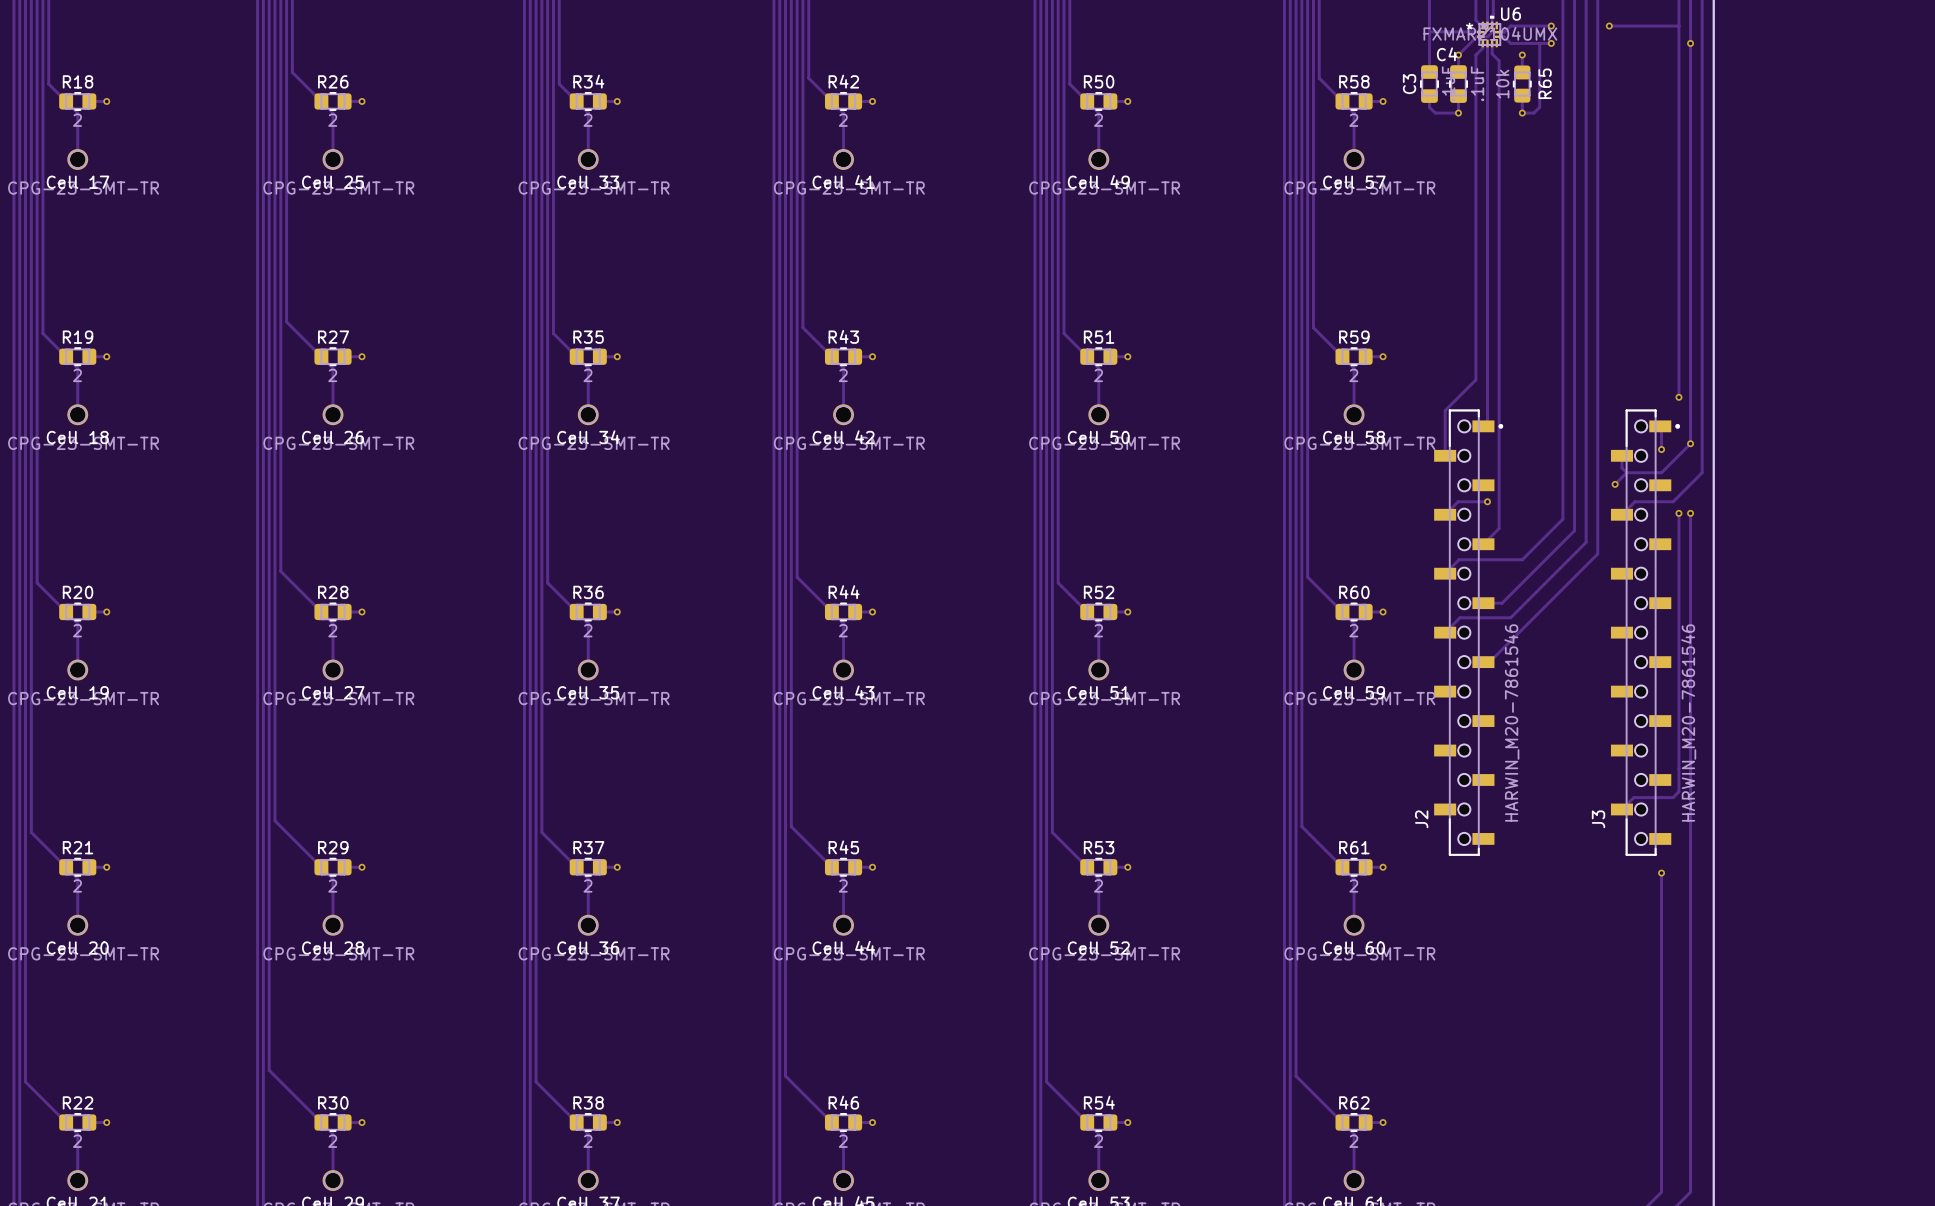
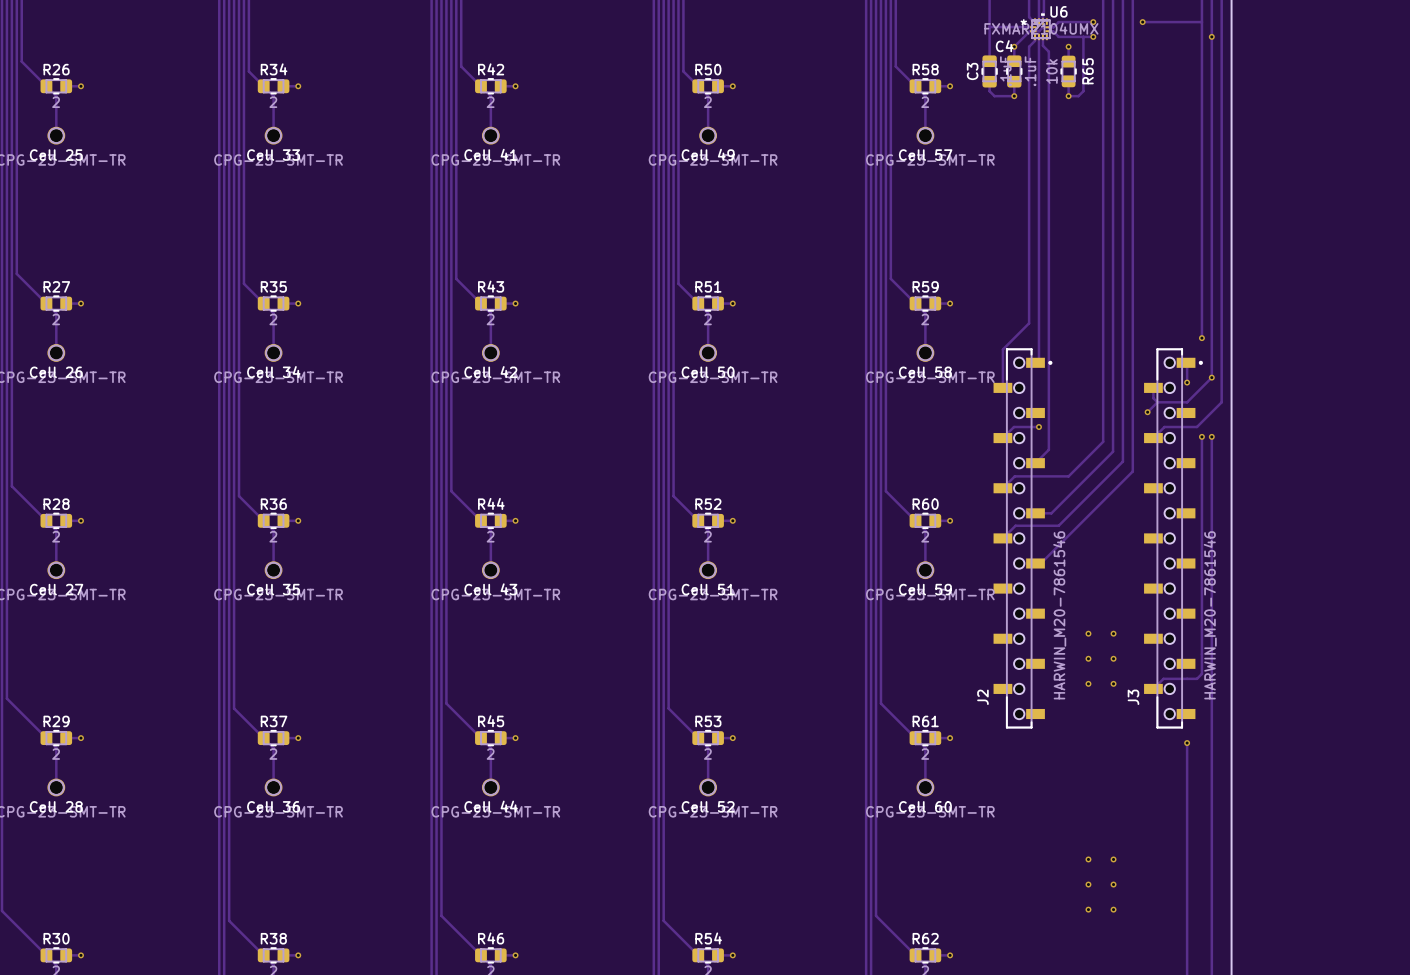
via: none -> (1088, 633)
via: none -> (1113, 633)
via: none -> (1088, 658)
via: none -> (1113, 658)
via: none -> (1088, 683)
via: none -> (1113, 683)
via: none -> (1088, 859)
via: none -> (1113, 859)
via: none -> (1088, 884)
via: none -> (1113, 884)
via: none -> (1088, 909)
via: none -> (1113, 909)

